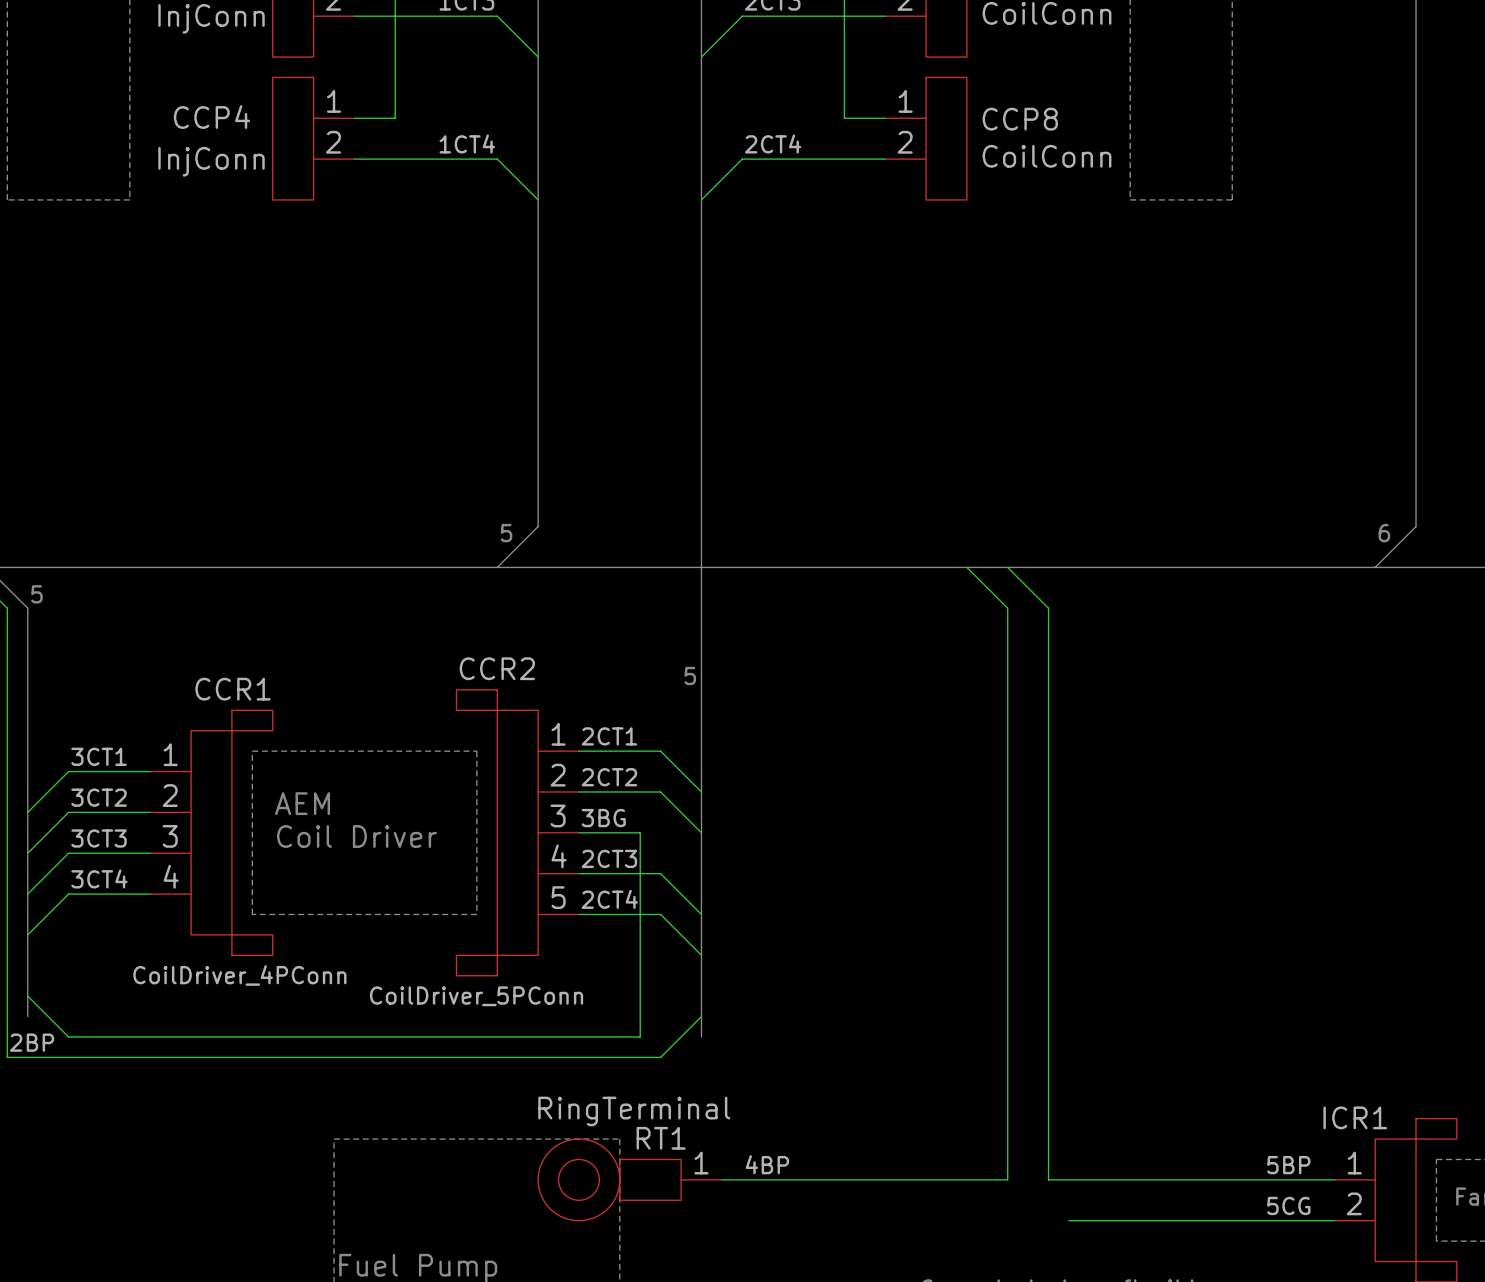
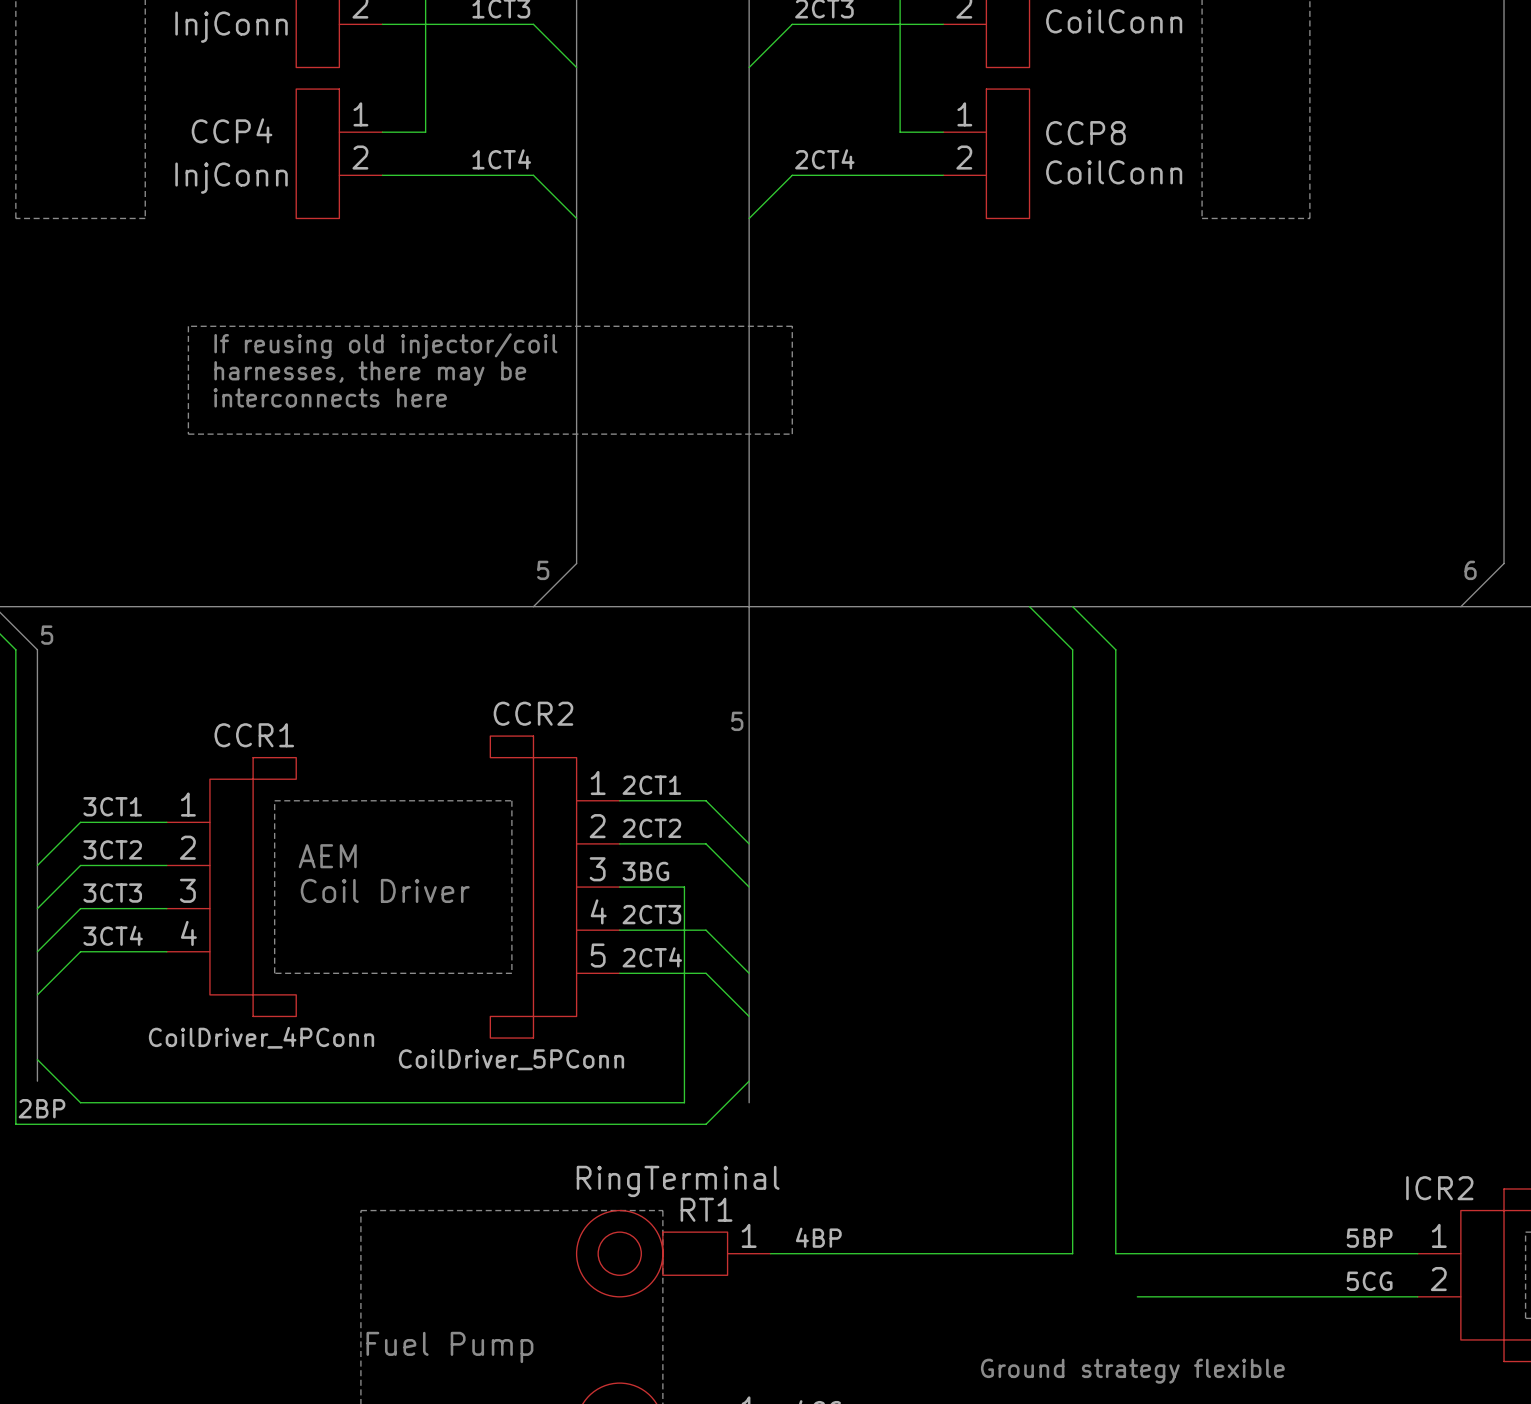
line: none -> (188, 326) (188, 434) (792, 434) (792, 326) (188, 326)
text: none -> If reusing old injector/coil (385, 346)
text: none -> harnesses, there may be (370, 373)
text: none -> interconnects here (330, 397)
ICR1 name: ICR1 (1355, 1117) -> ICR2 (1439, 1188)

